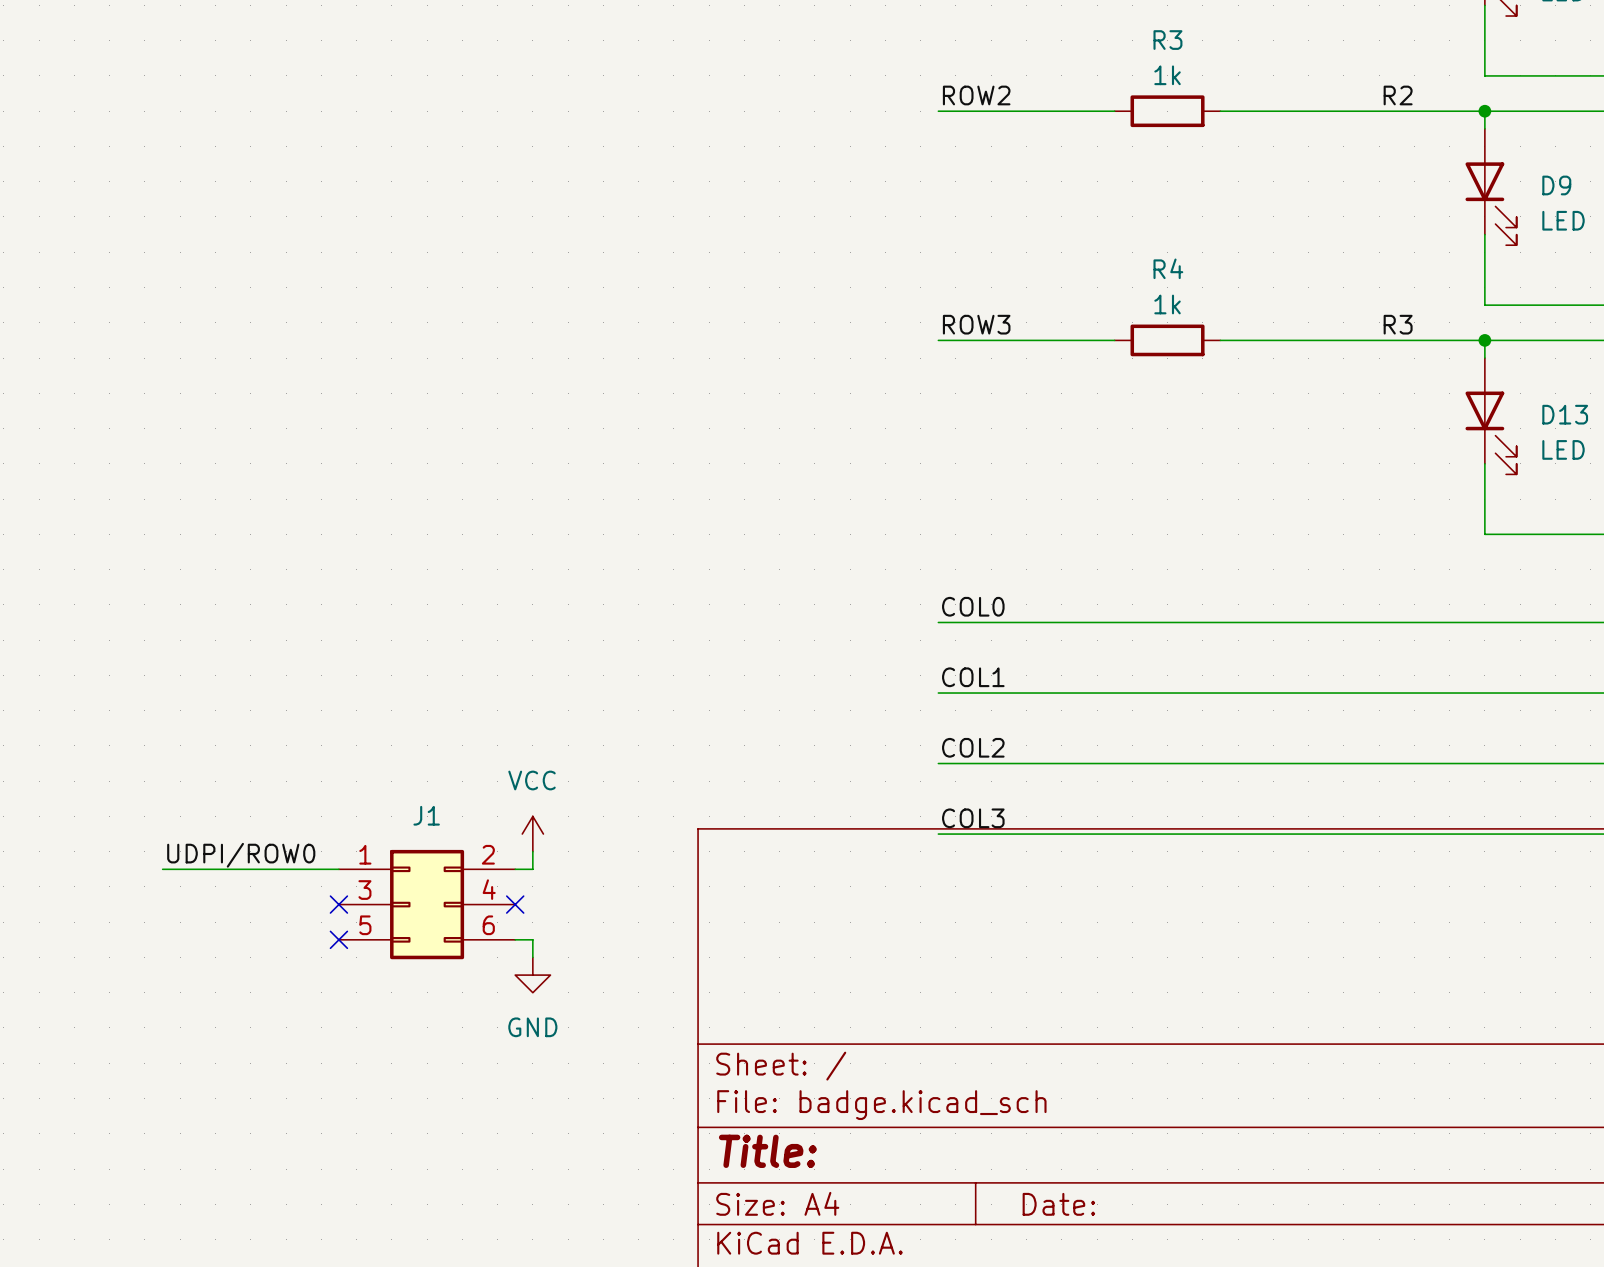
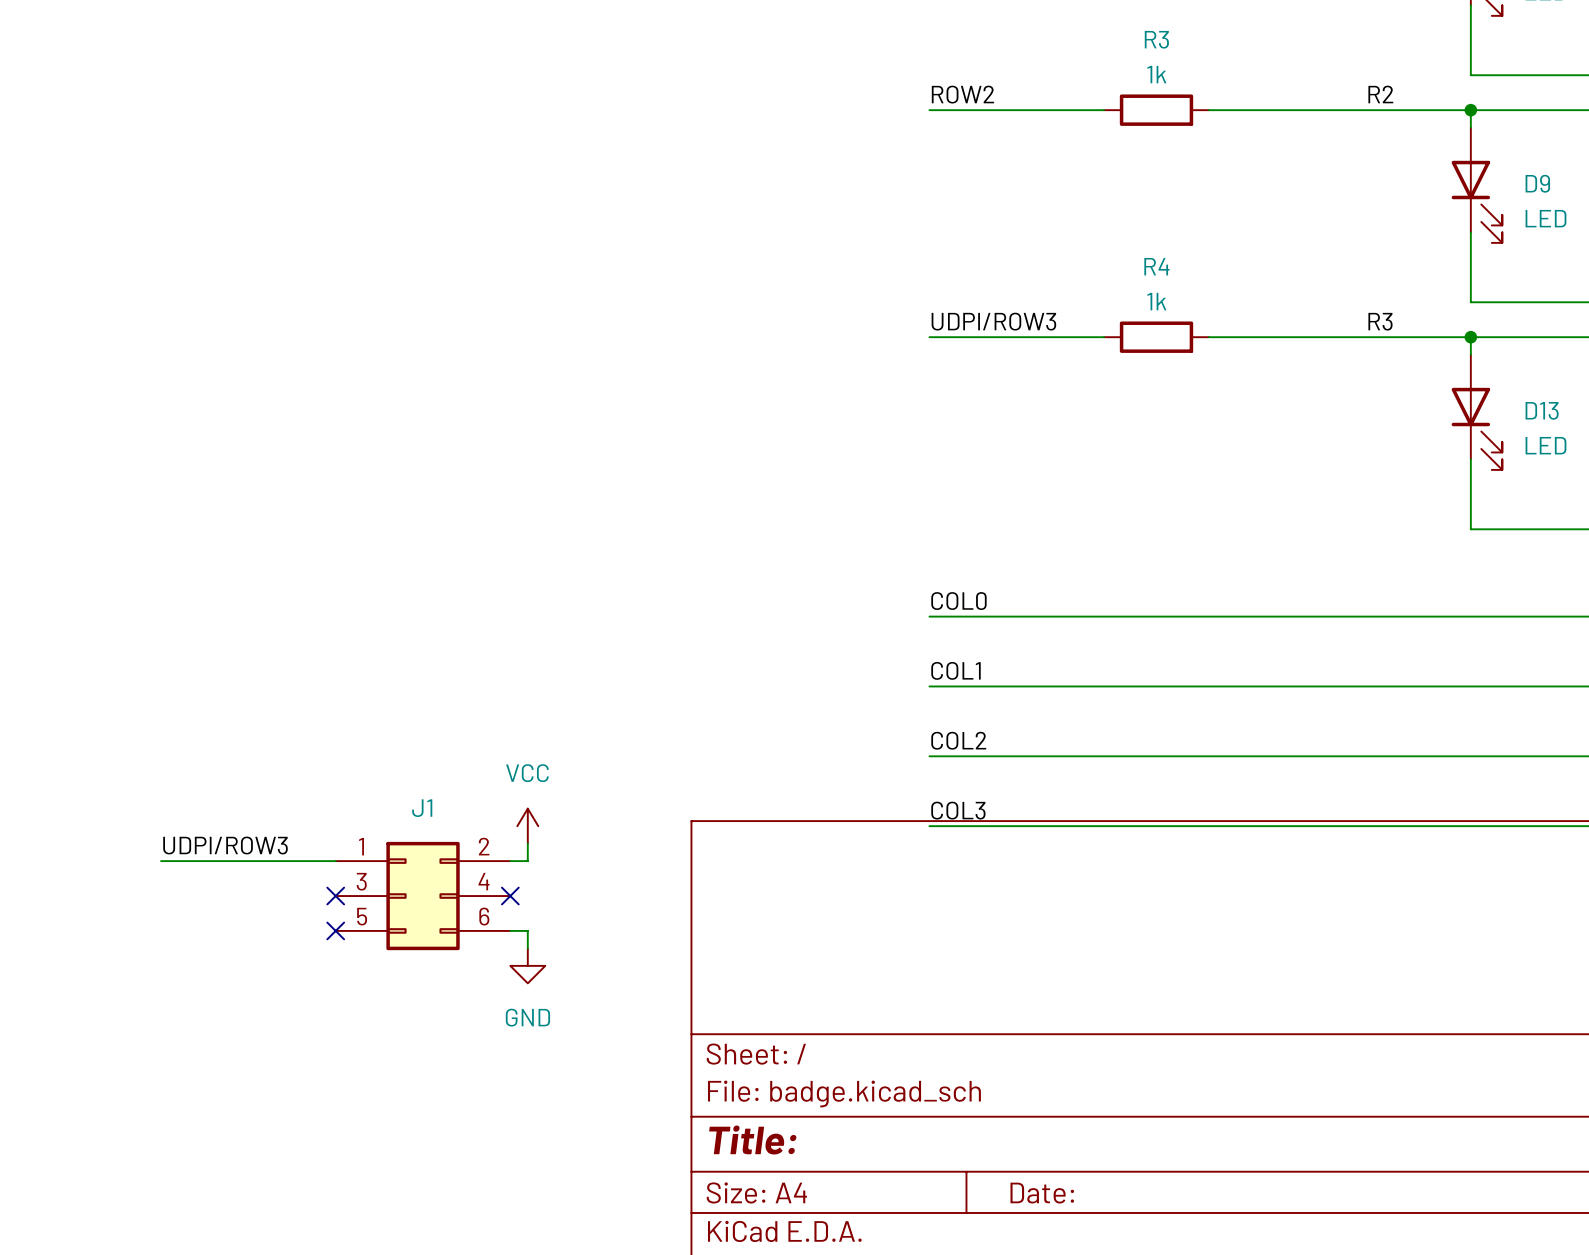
label: ROW3 (976, 324) -> UDPI/ROW3 (993, 321)
label: UDPI/ROW0 (241, 855) -> UDPI/ROW3 (225, 845)

